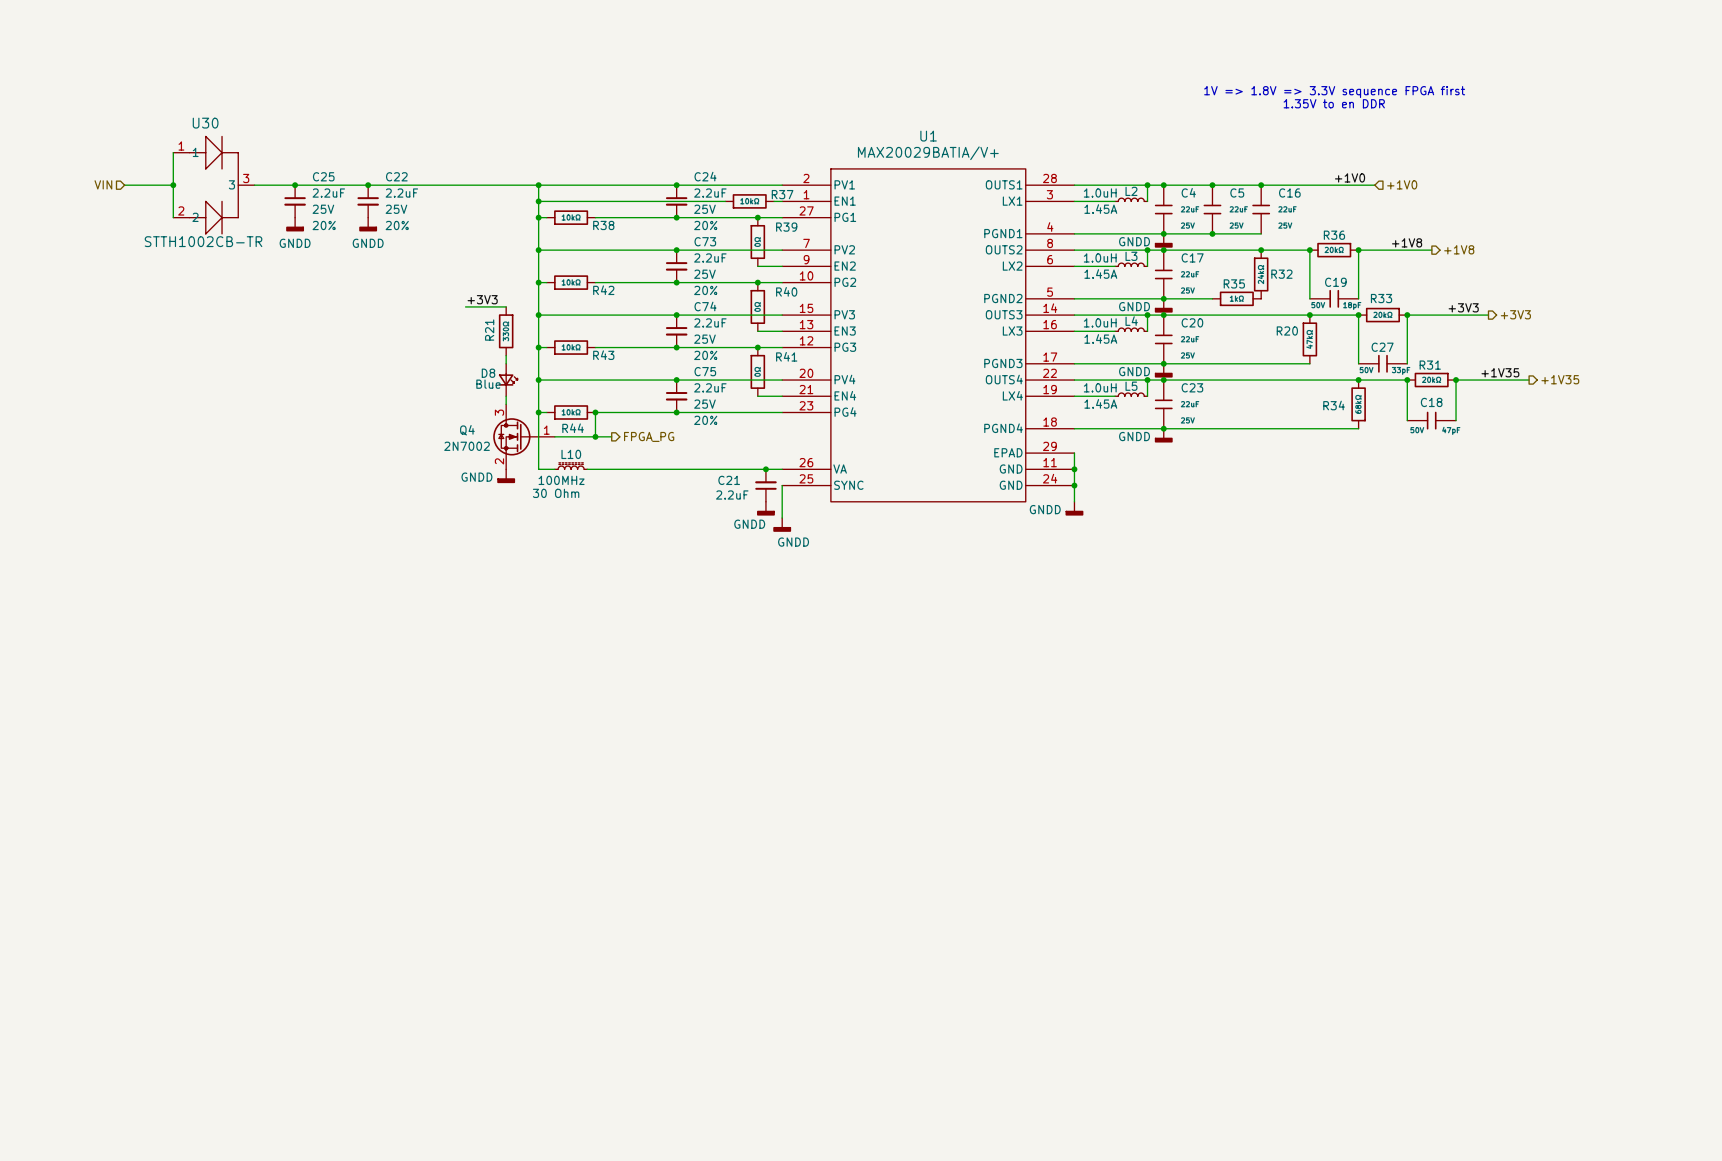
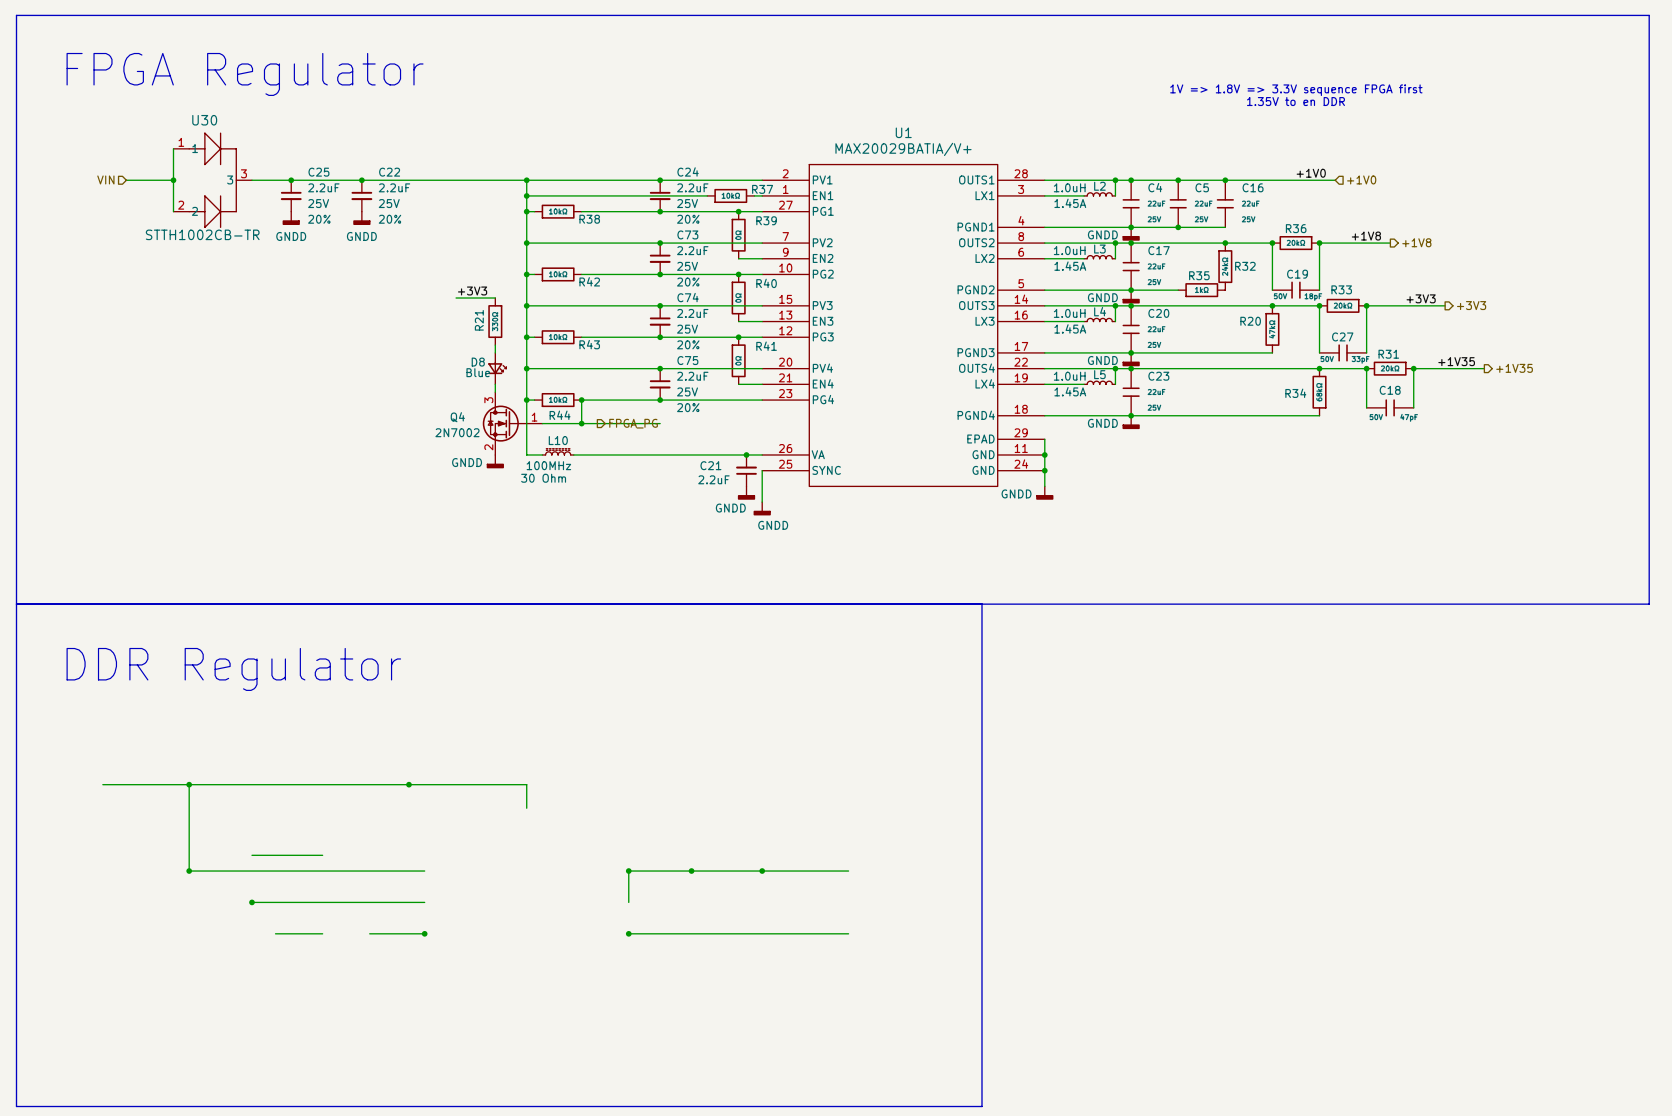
text: none -> FPGA Regulator (245, 74)
wire: none -> (597, 423) (660, 423)
line: none -> (16, 604) (1649, 604) (1649, 15) (16, 15) (16, 1106) (981, 1106) (981, 604)
text: none -> DDR Regulator (233, 669)
wire: none -> (102, 784) (526, 784) (526, 808)
wire: none -> (189, 784) (189, 871) (424, 871)
junction: none -> (189, 784)
junction: none -> (408, 784)
wire: none -> (251, 855) (322, 855)
junction: none -> (189, 871)
junction: none -> (628, 871)
junction: none -> (691, 871)
junction: none -> (762, 871)
wire: none -> (848, 871) (628, 871) (628, 902)
wire: none -> (251, 902) (424, 902)
junction: none -> (251, 902)
wire: none -> (275, 933) (322, 933)
wire: none -> (369, 933) (424, 933)
junction: none -> (424, 933)
wire: none -> (628, 933) (848, 933)
junction: none -> (628, 933)

